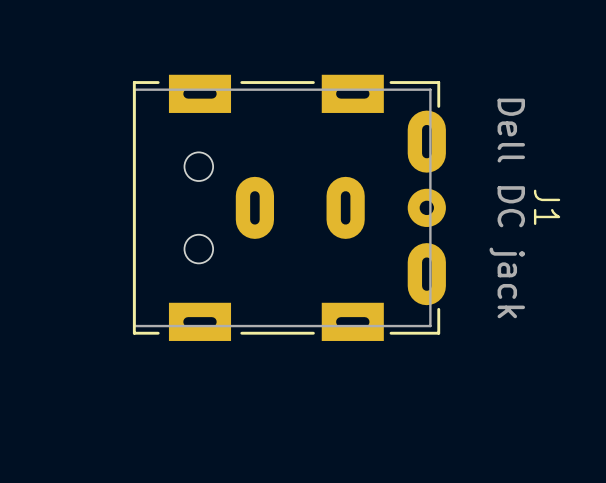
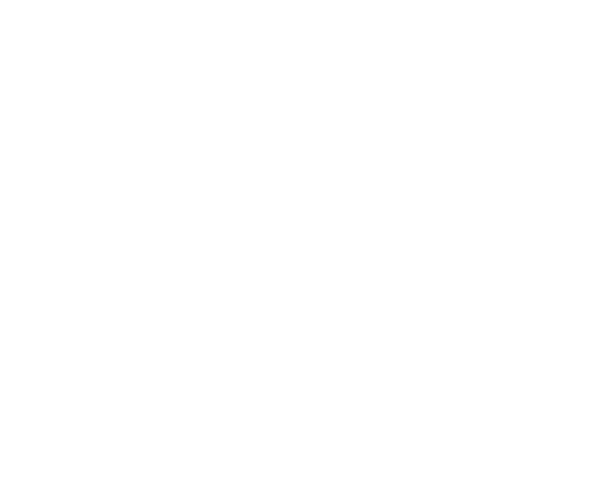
J1: Dell DC jack (289, 207) -> none

